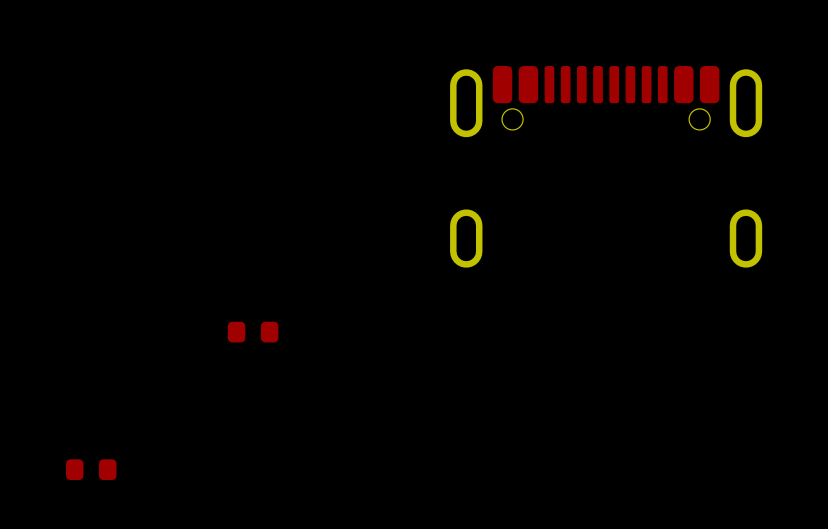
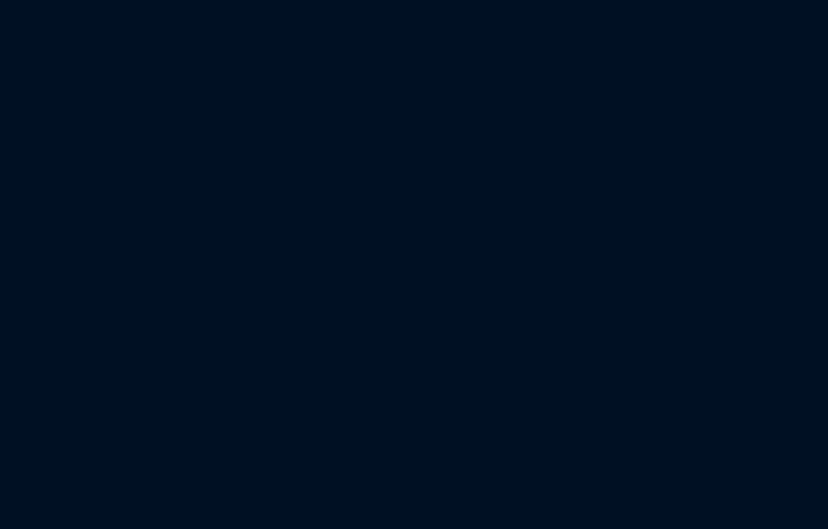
part: (606, 166) -> none
part: (253, 332) -> none
part: (91, 469) -> none

